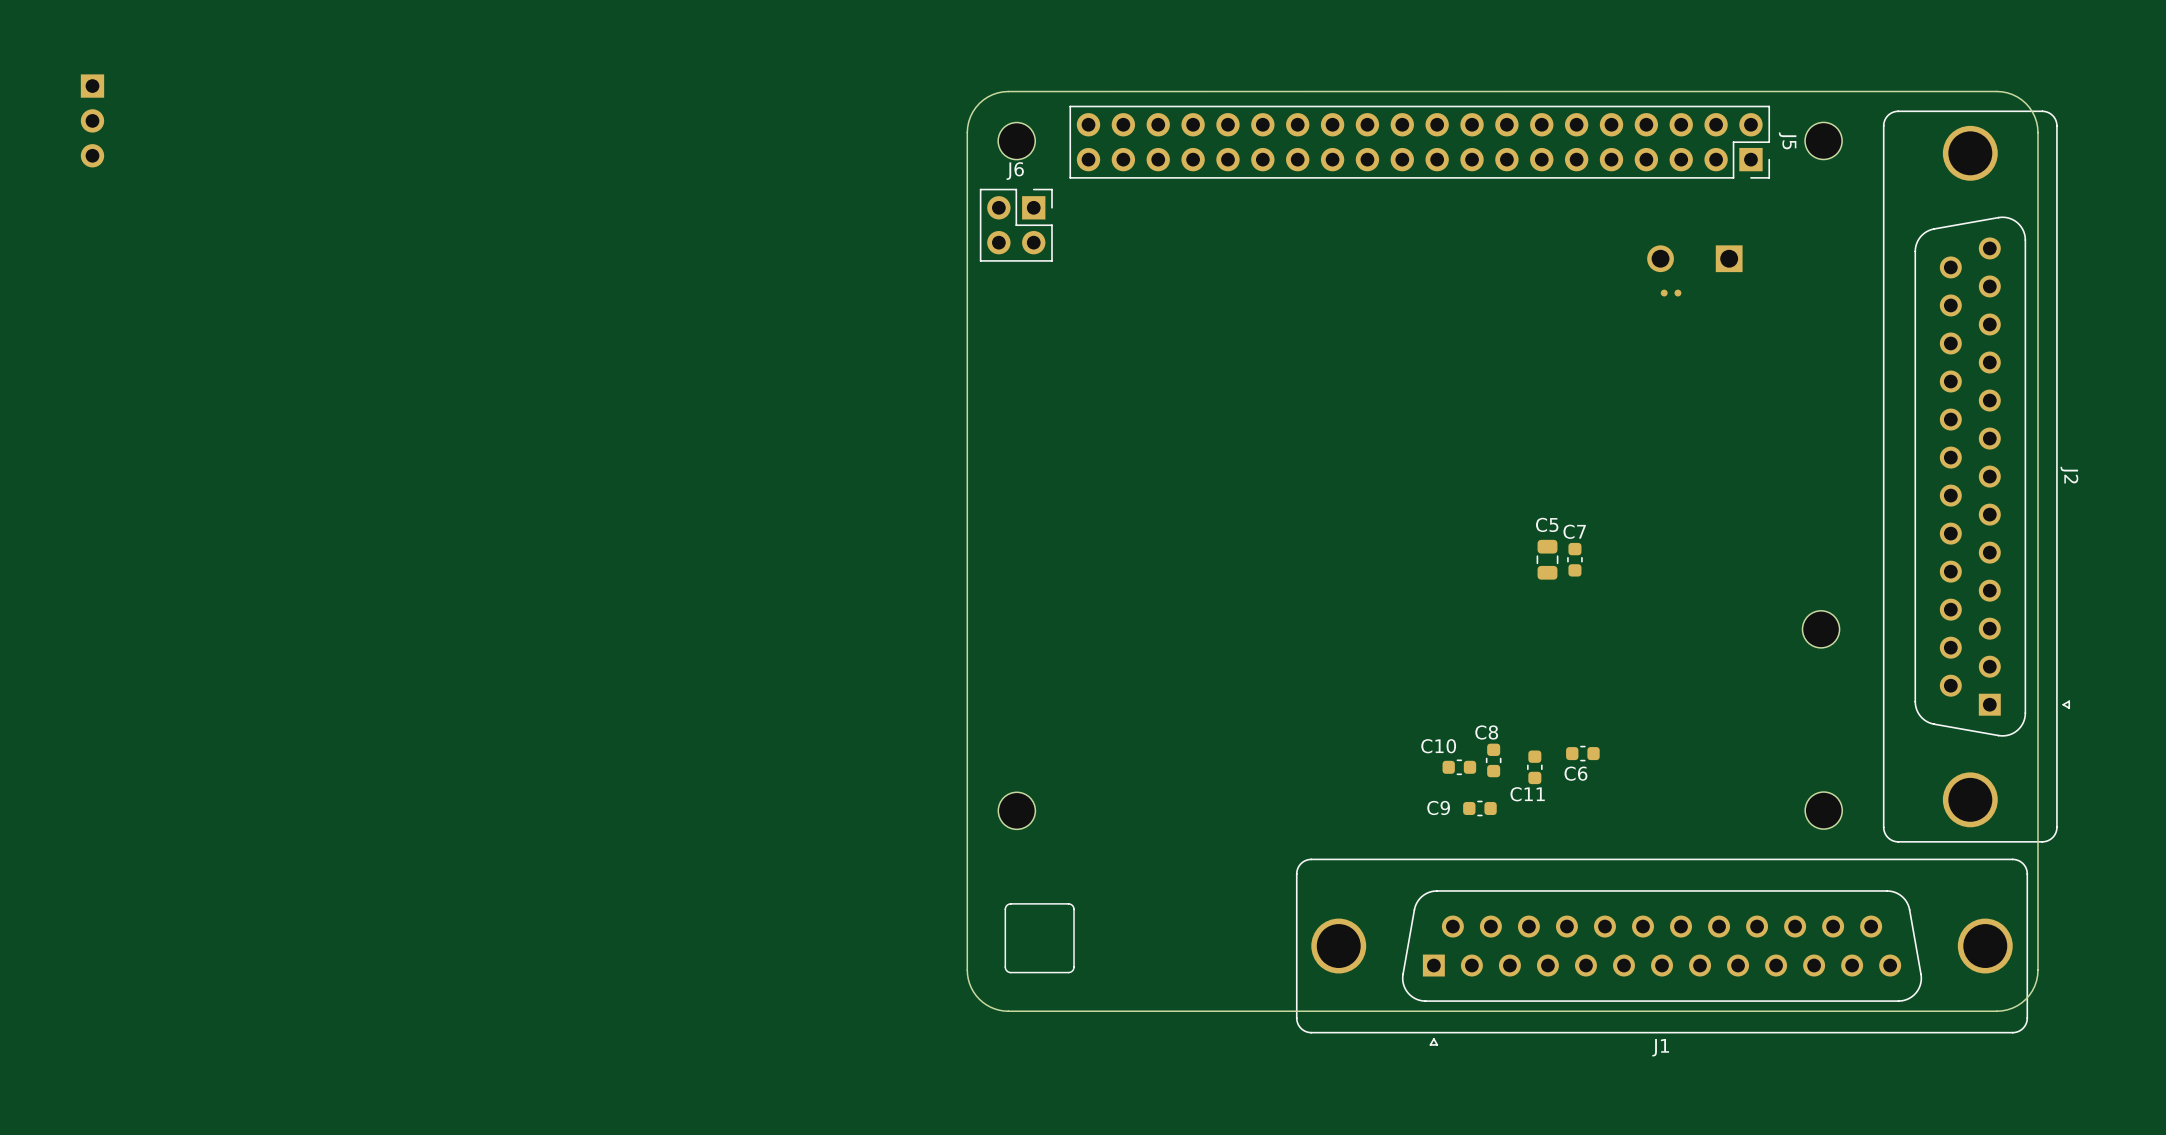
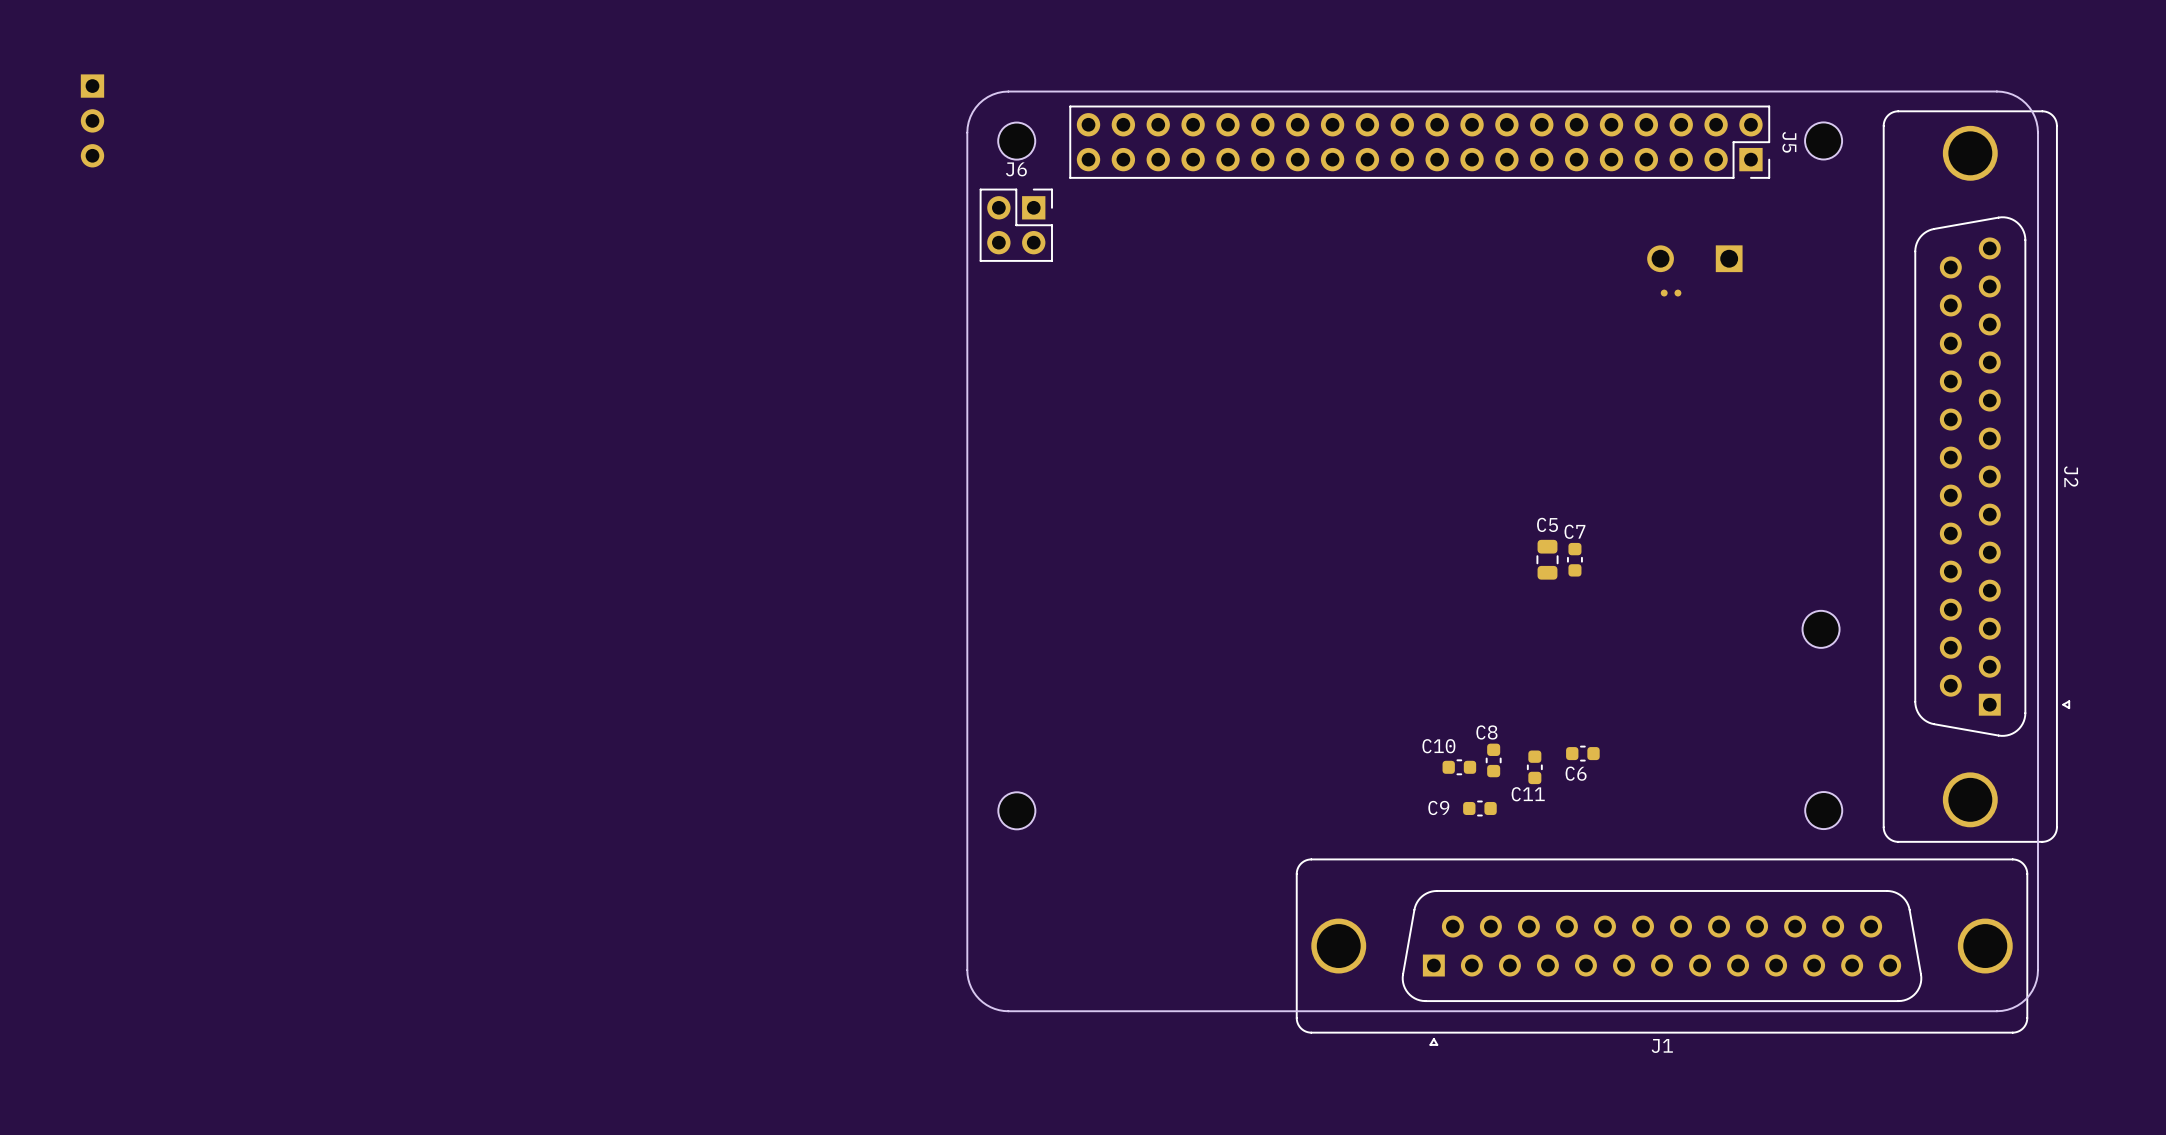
drawing: [1004, 903, 1075, 974] -> none

